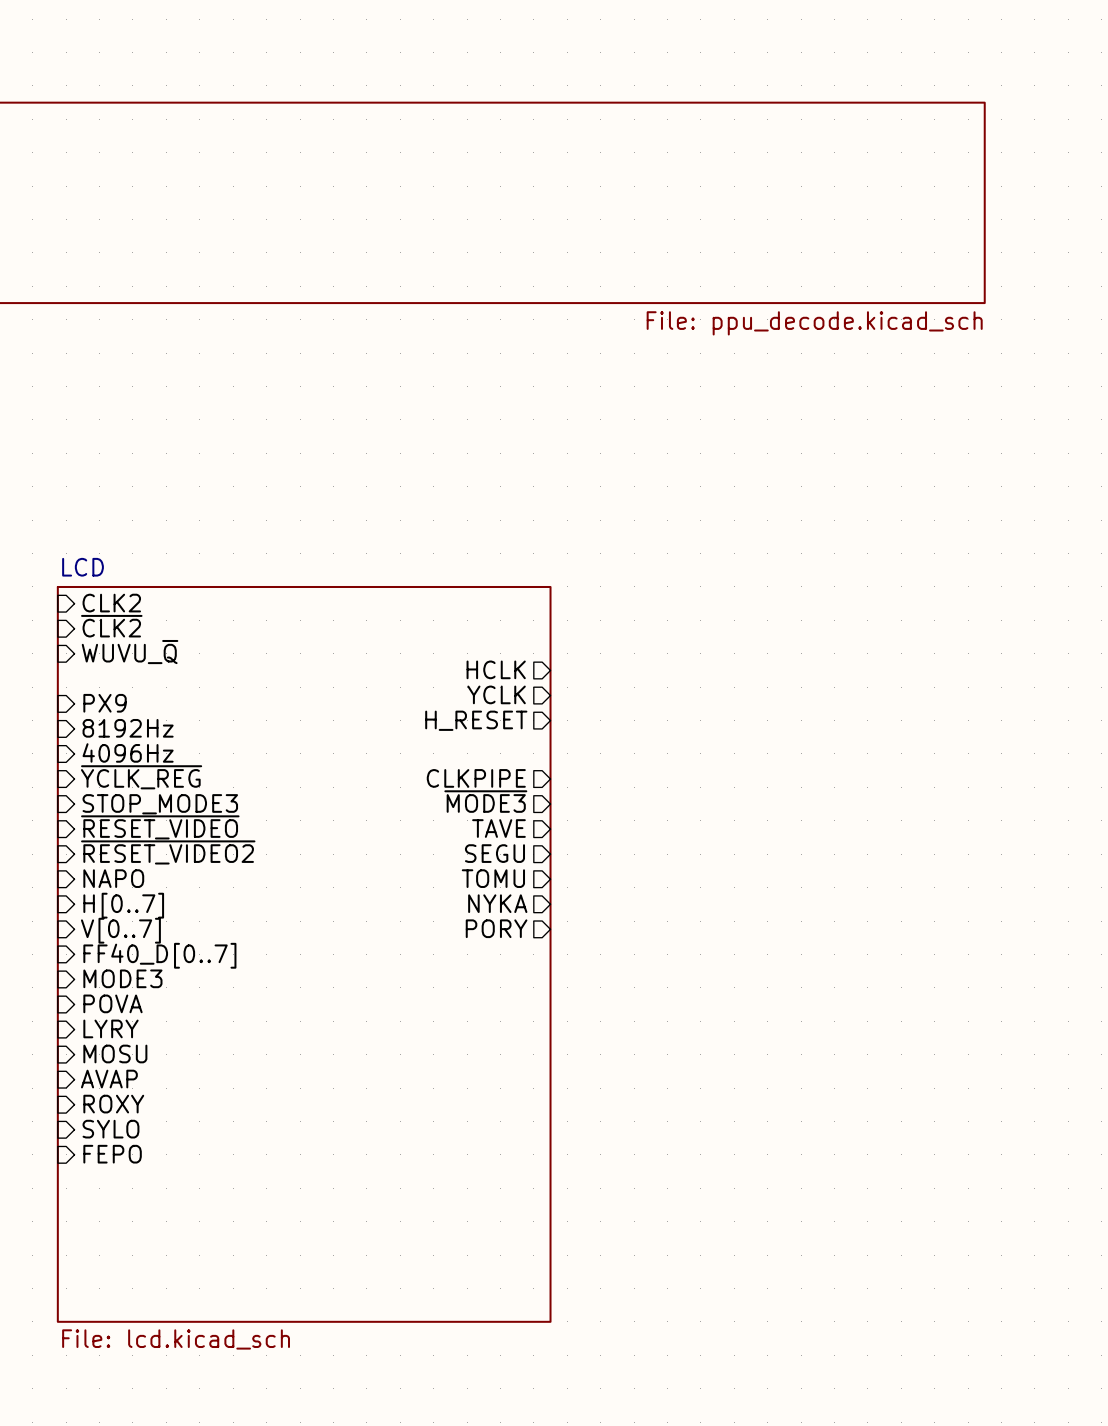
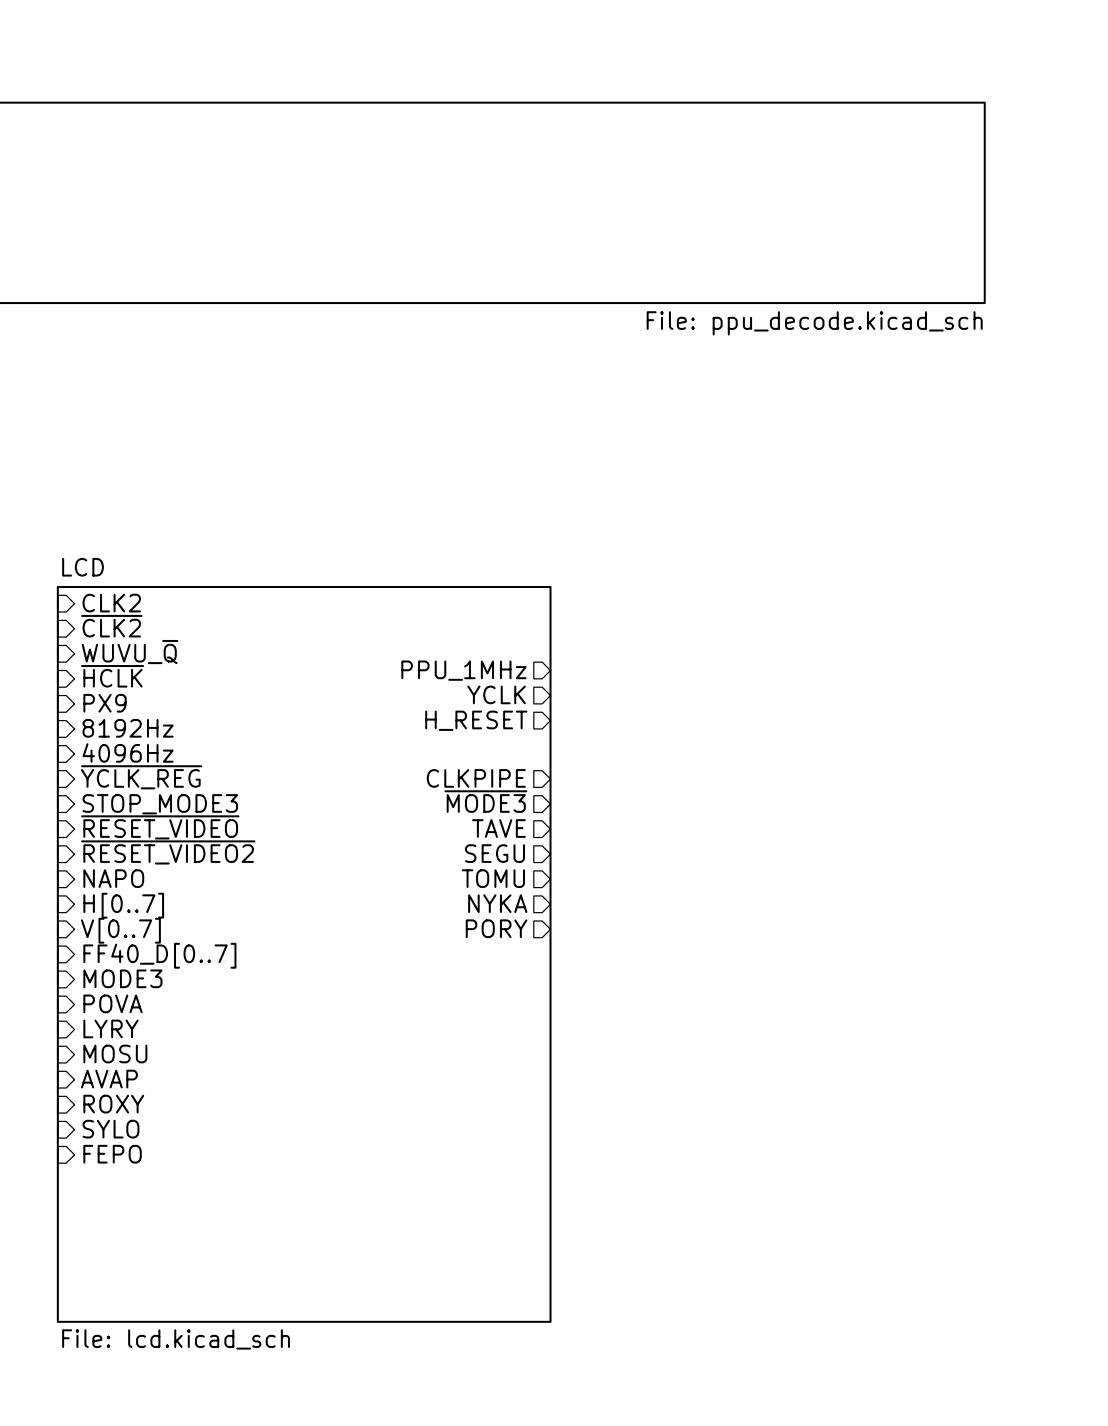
sheet pin: HCLK (496, 669) -> PPU_1MHz (463, 670)
sheet pin: none -> ~{HCLK} (112, 676)

